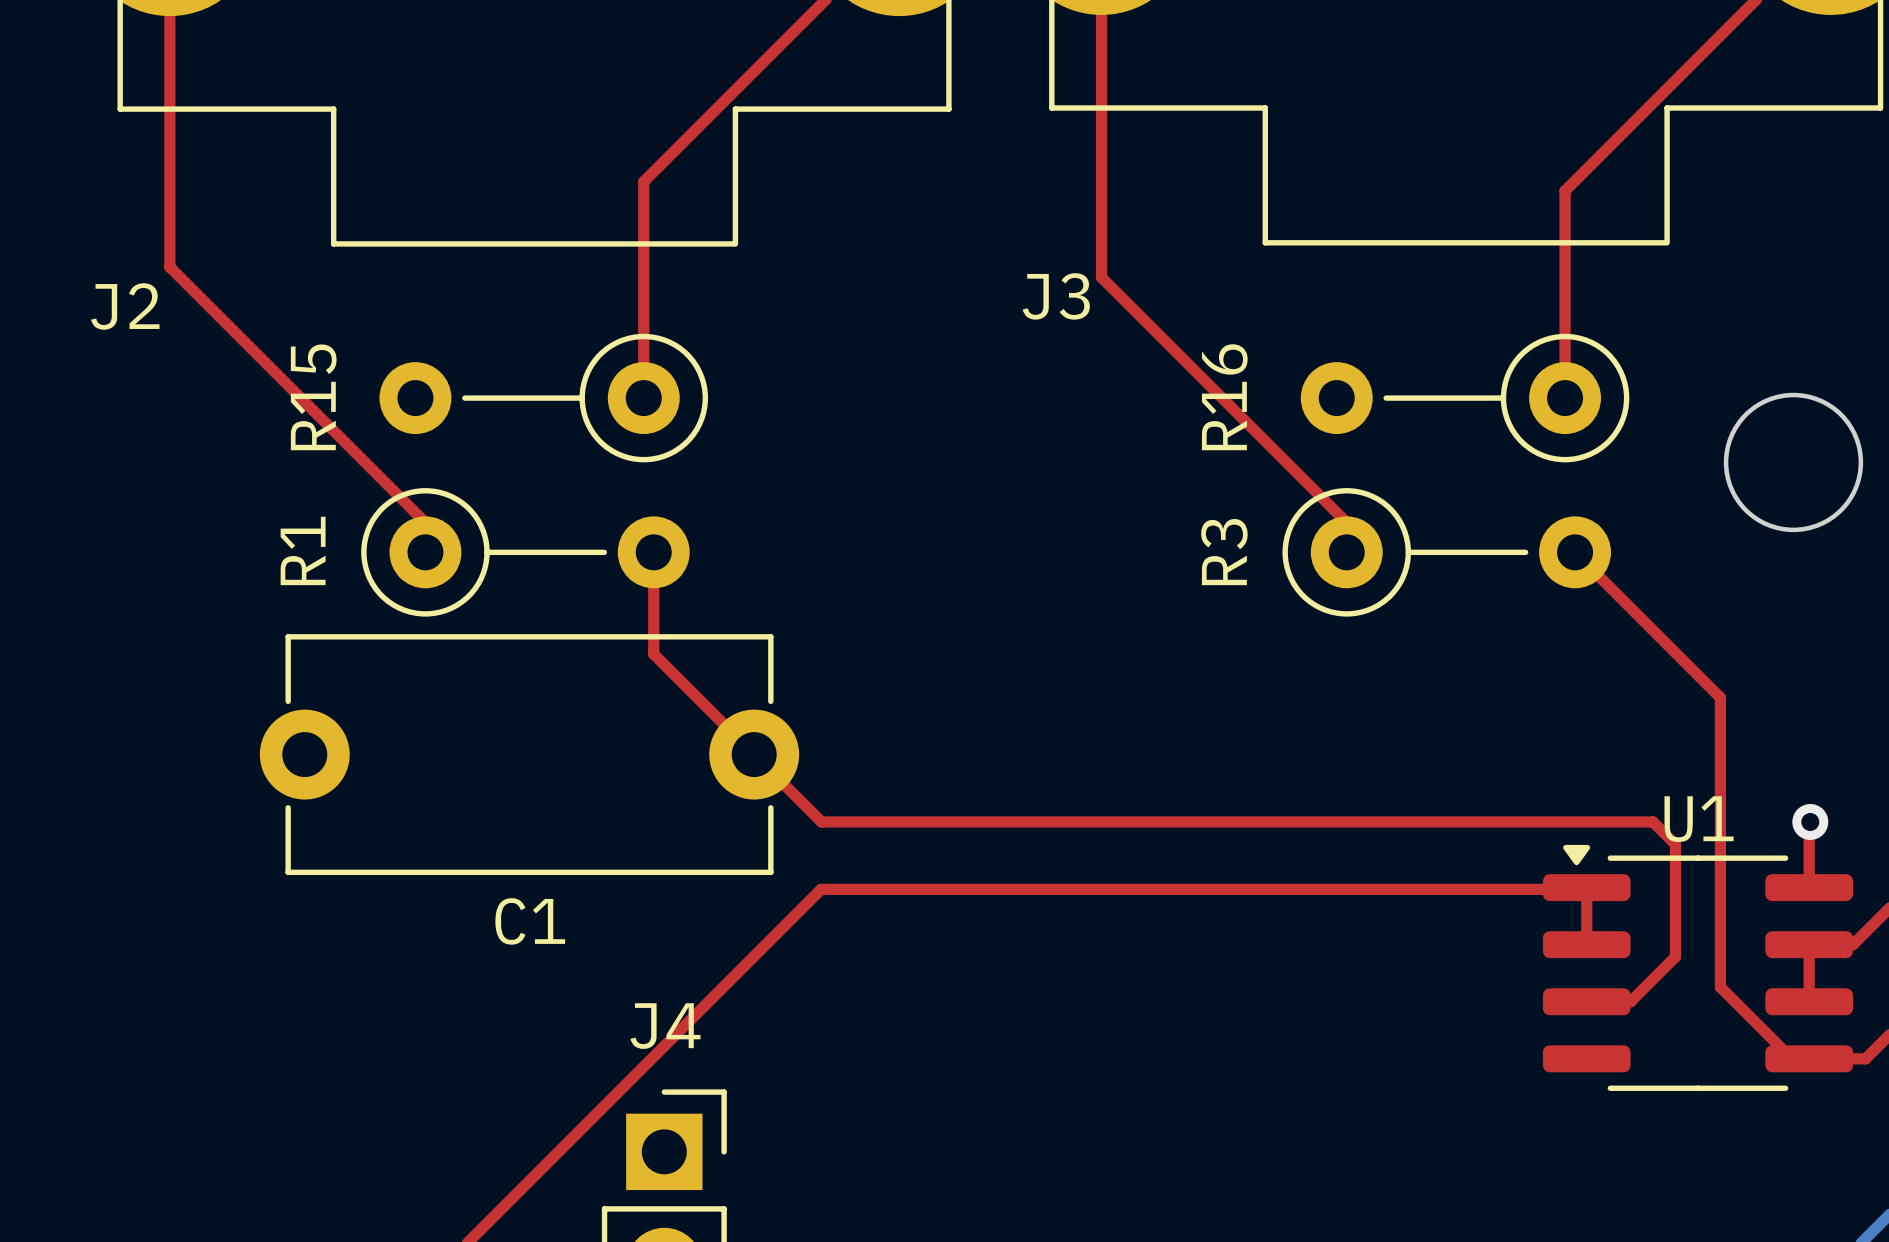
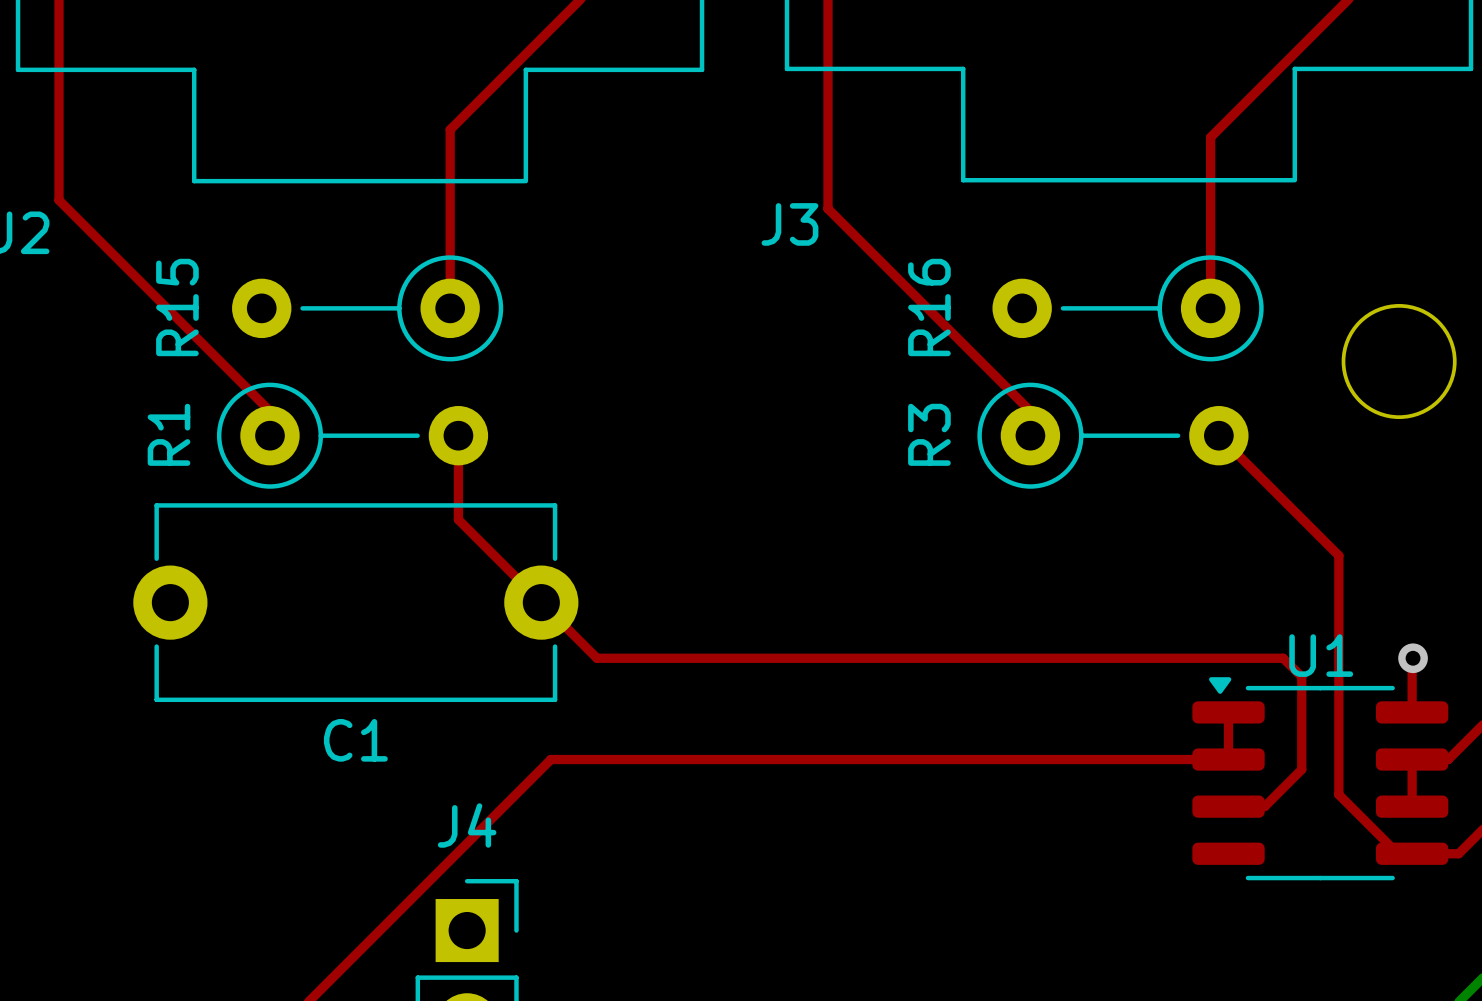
top track: (1586, 887) (1584, 889) (821, 889) (765, 944) -> (1228, 759) (550, 759)

